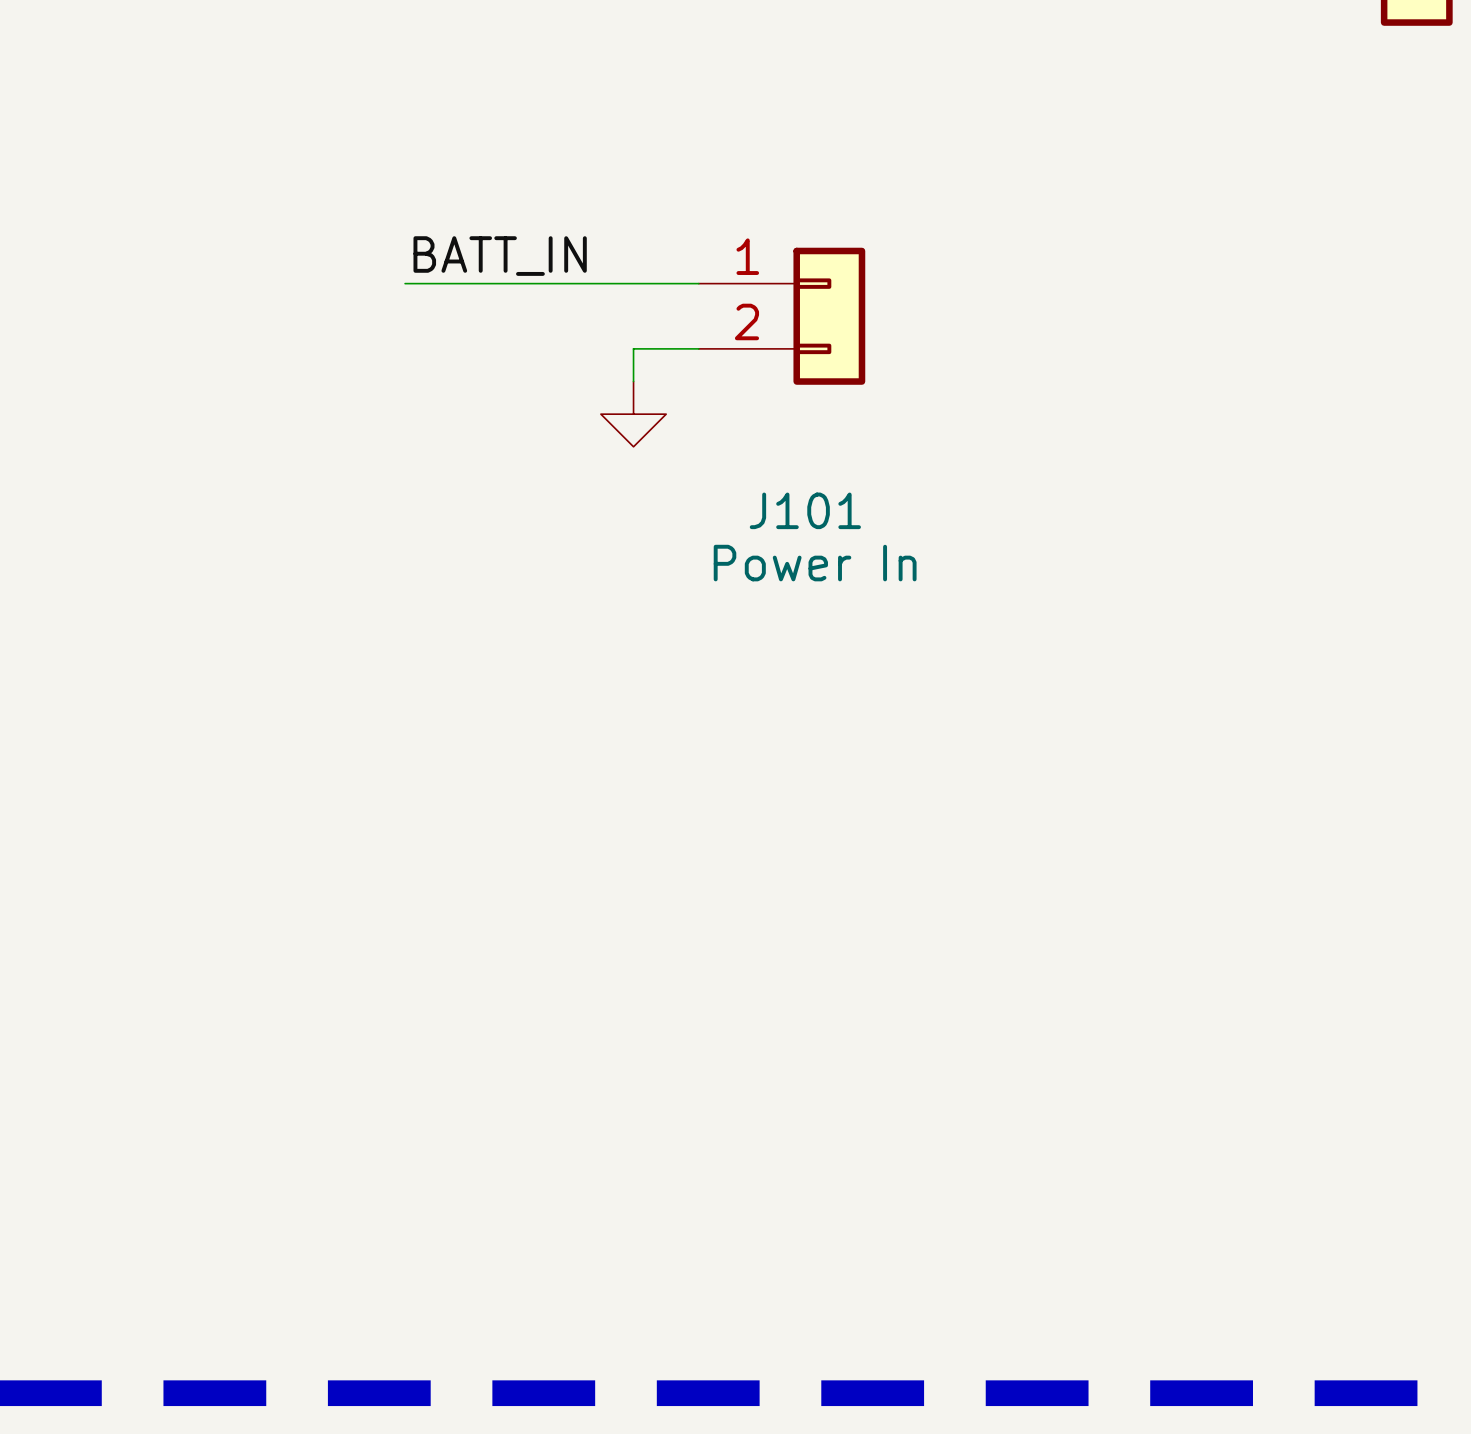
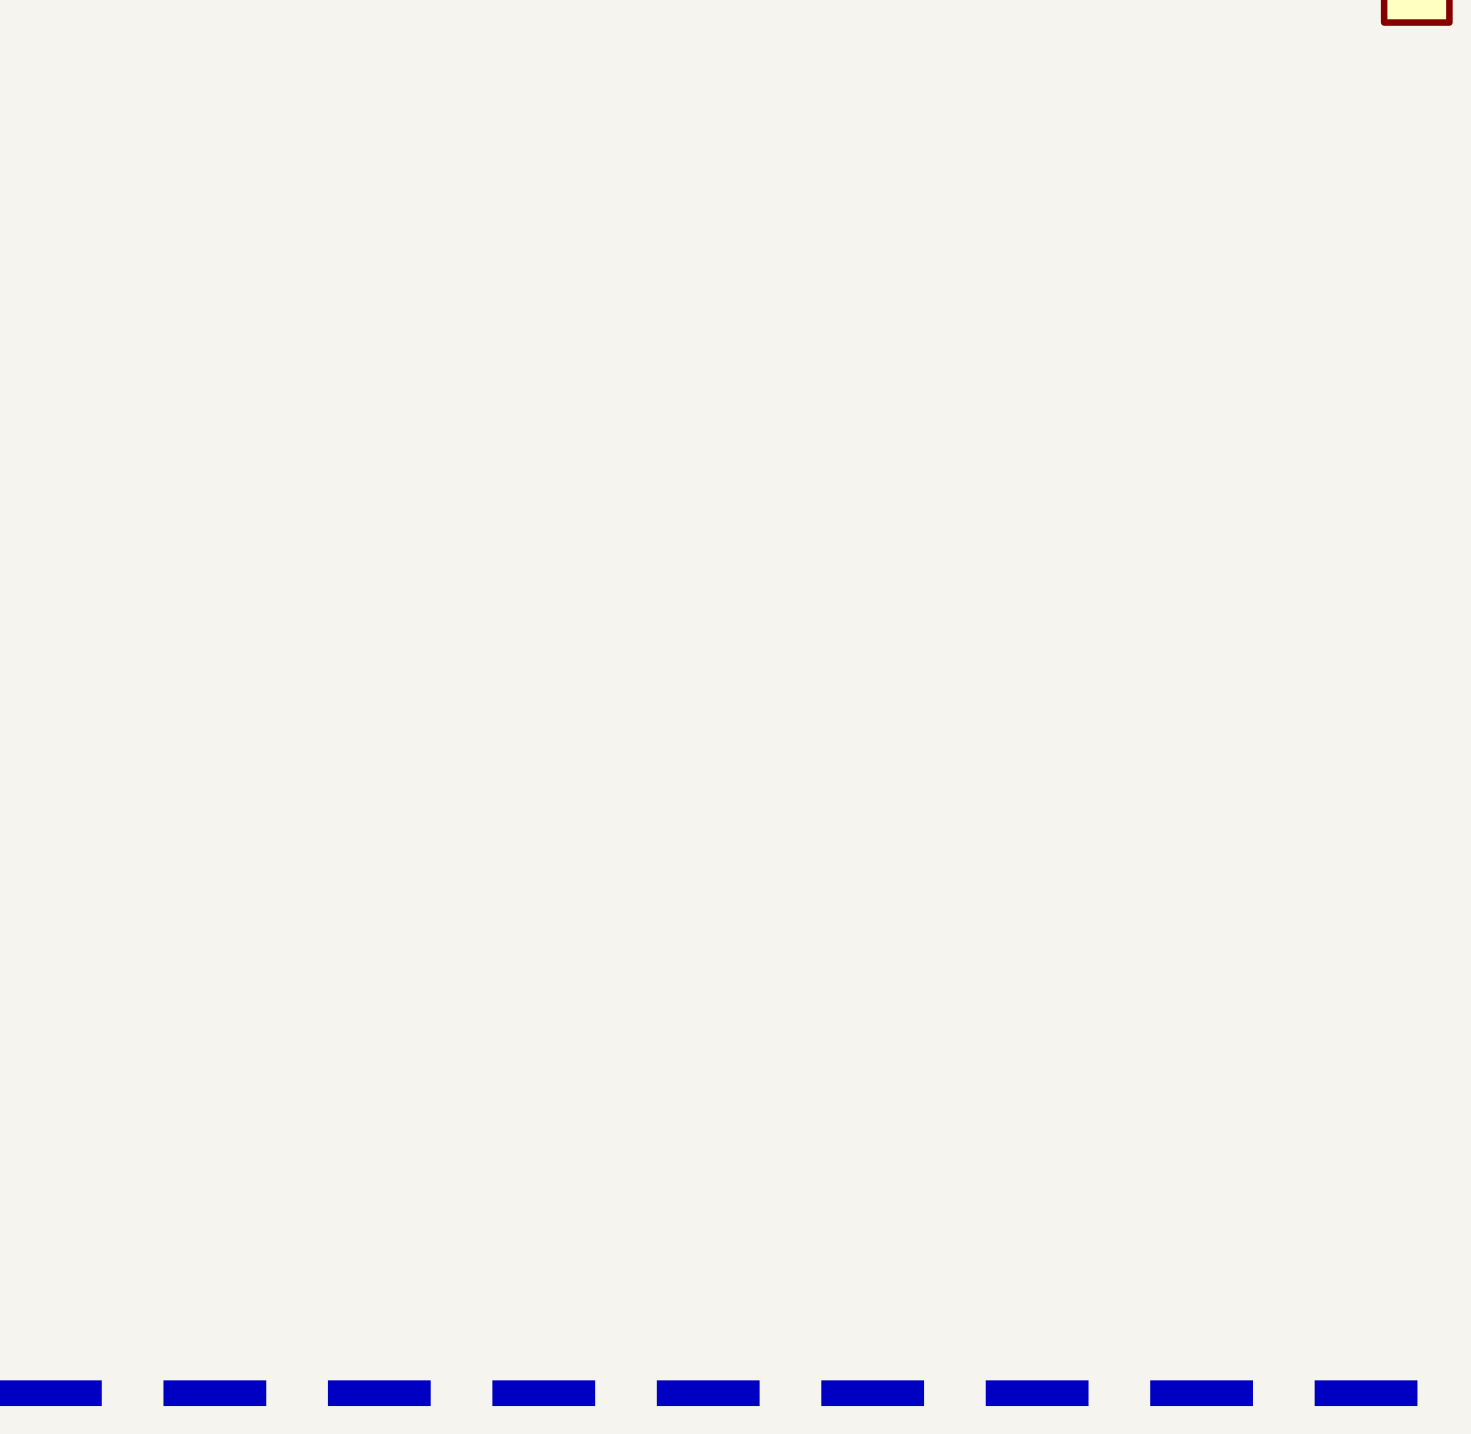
label: BATT_IN (500, 256) -> none
wire: (405, 283) (698, 283) -> none
J101: Power In (782, 316) -> none
wire: (698, 348) (633, 348) (633, 381) -> none
power symbol: (633, 414) -> none

